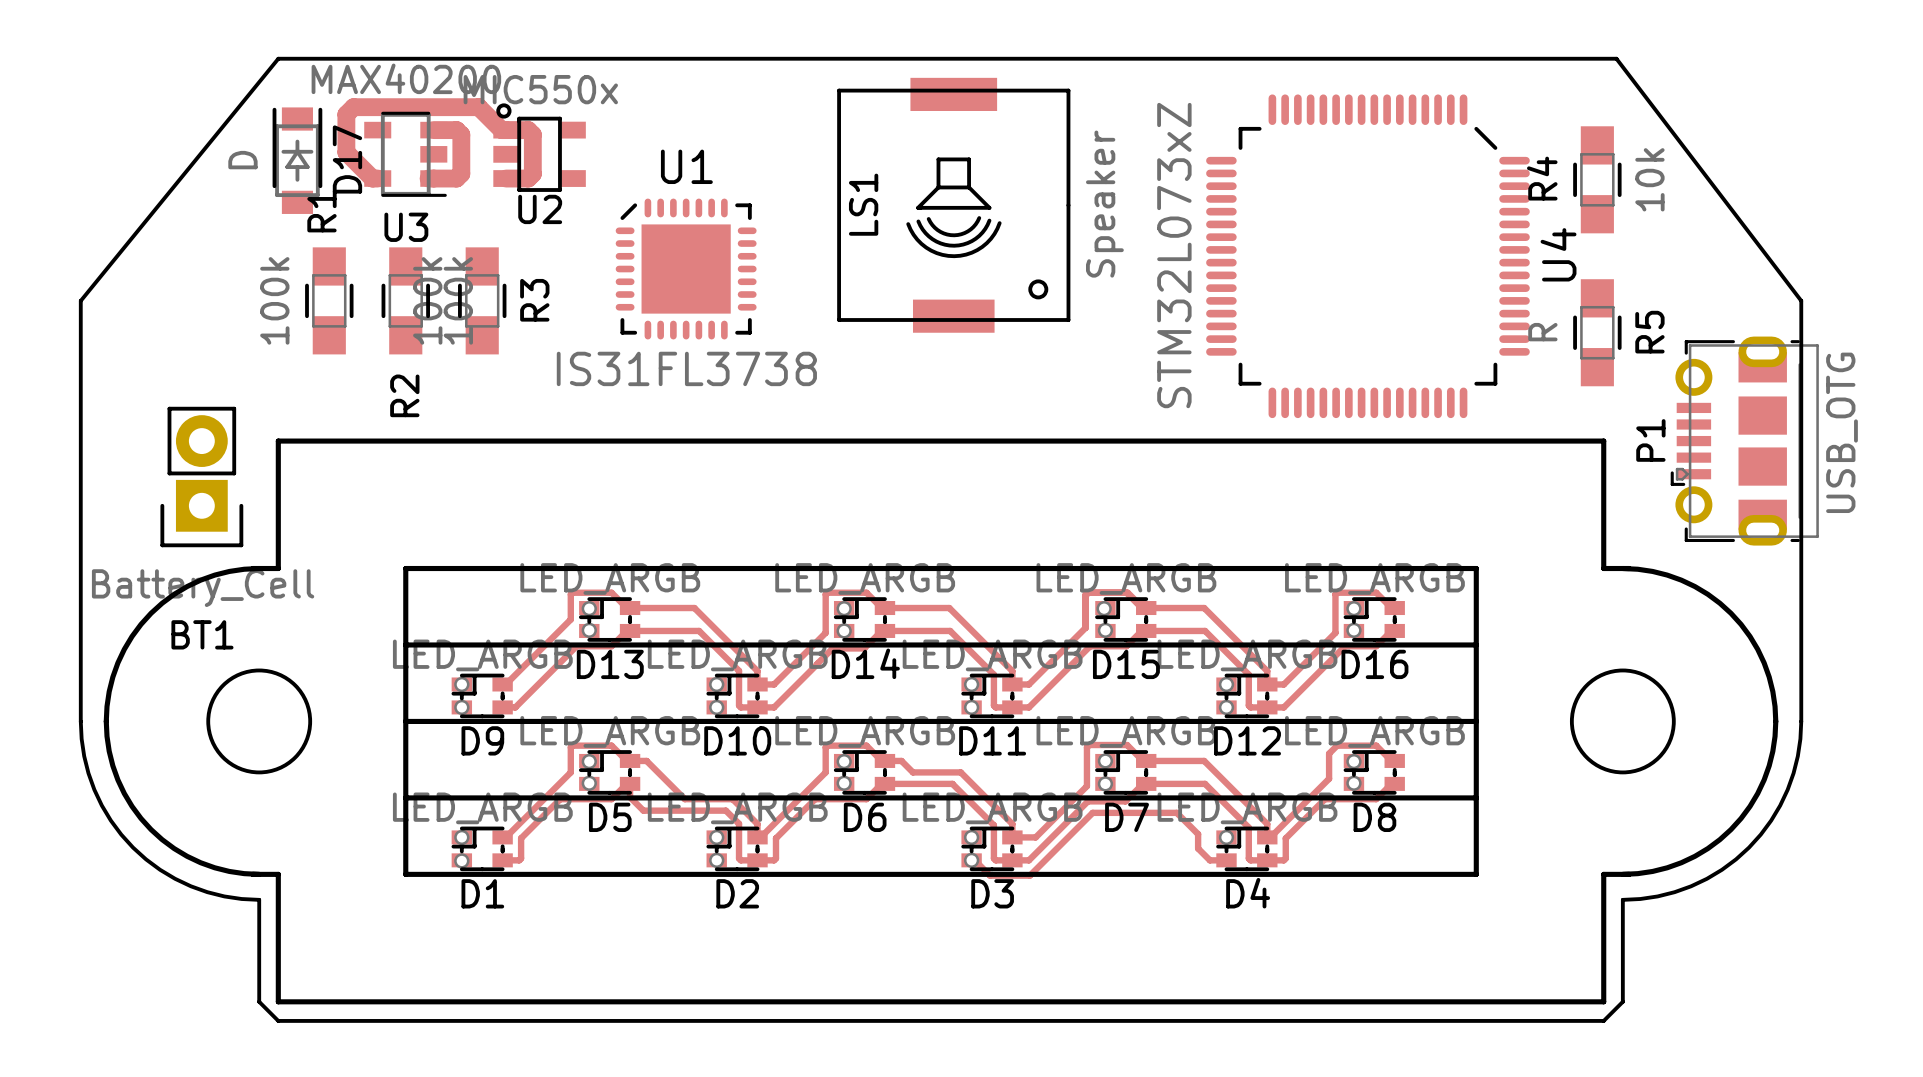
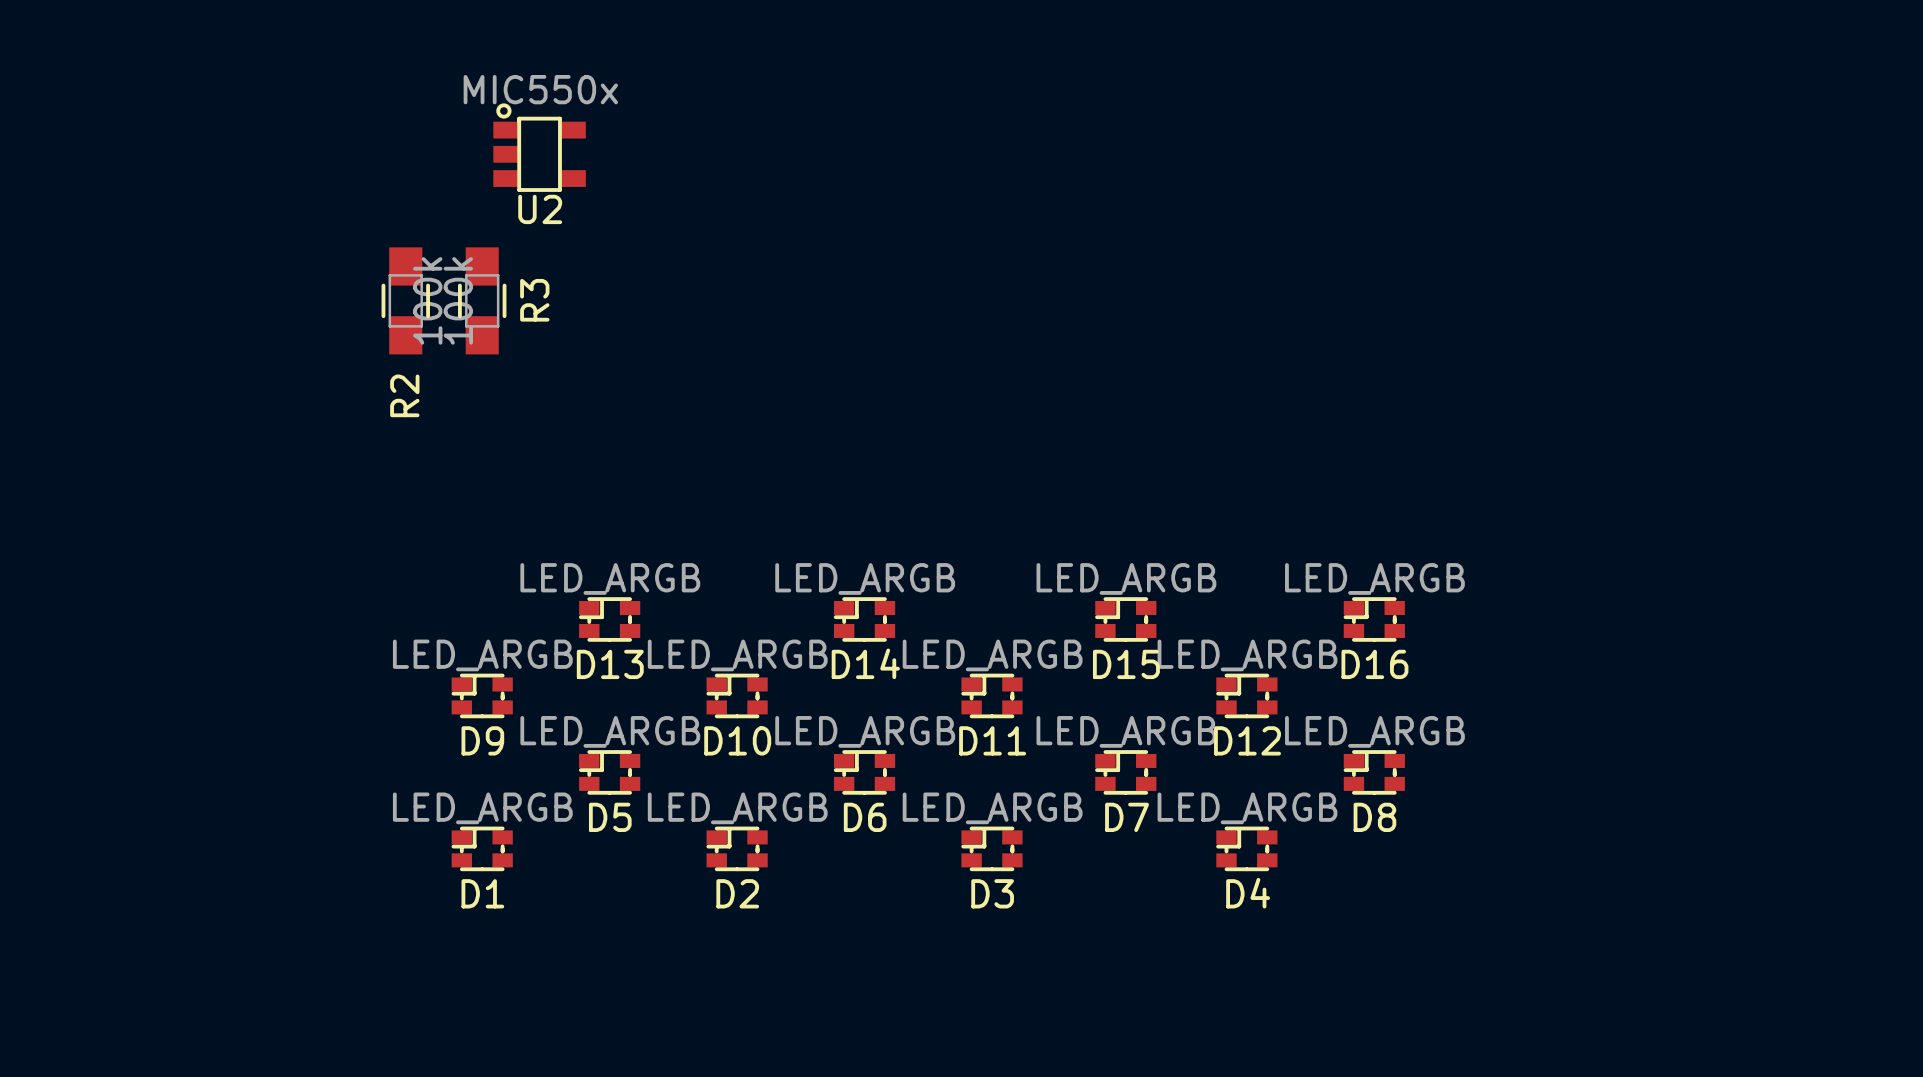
board edge: (278, 58) (1616, 58) (1801, 300) (1801, 721) (1797, 756) (1787, 789) (1780, 805) (1760, 834) (1736, 859) (1721, 869) (1706, 878) (1674, 892) (1657, 896) (1622, 899) (1622, 1001) (1603, 1020) (278, 1020) (259, 1001) (259, 899) (224, 896) (190, 886) (160, 869) (133, 847) (110, 820) (94, 789) (84, 756) (80, 721) (80, 300) (278, 58) -> none
track: (433, 130) (456, 130) (461, 134) (461, 173) (456, 178) (428, 178) -> none
U3: MAX40200 (405, 154) -> none
D17: D (297, 160) -> none
track: (377, 178) (372, 178) (346, 152) (346, 114) (353, 107) (478, 107) (501, 130) (528, 130) (532, 134) (532, 173) (528, 178) (506, 178) (525, 178) -> none
R4: 10k (1597, 179) -> none
LS1: Speaker (953, 205) -> none
U4: STM32L073xZ (1367, 256) -> none
U1: IS31FL3738 (686, 269) -> none
R1: 100k (329, 300) -> none
R5: R (1597, 332) -> none
P1: USB_OTG (1744, 441) -> none
BT1: Battery_Cell (201, 477) -> none
line: (252, 568) (278, 568) (278, 441) (1603, 441) (1603, 568) (1629, 568) -> none
line: (259, 568) (229, 571) (200, 580) (174, 594) (151, 613) (132, 636) (117, 662) (109, 691) (106, 721) (109, 751) (117, 779) (132, 806) (151, 829) (174, 848) (200, 862) (229, 871) (259, 874) -> none
line: (405, 568) (1476, 568) (1476, 874) (405, 874) (405, 568) -> none
line: (1622, 568) (1652, 571) (1681, 580) (1707, 594) (1730, 613) (1750, 636) (1764, 662) (1772, 691) (1775, 721) (1772, 751) (1764, 779) (1750, 806) (1730, 829) (1707, 848) (1681, 862) (1652, 871) (1622, 874) -> none
track: (1126, 592) (1141, 608) (1204, 608) (1267, 671) (1267, 684) (1283, 684) (1335, 632) (1335, 594) (1337, 592) (1376, 592) (1391, 608) (1394, 608) -> none
via: (589, 608) -> none
via: (844, 608) -> none
via: (1104, 608) -> none
track: (1143, 608) (1127, 592) (1087, 592) (1085, 594) (1085, 627) (1028, 684) (1012, 684) (1012, 671) (949, 608) (881, 608) (866, 592) (827, 592) (825, 594) (825, 632) (774, 684) (757, 684) (757, 671) (694, 608) (626, 608) (611, 592) (572, 592) (570, 594) (570, 619) (505, 684) (502, 684) -> none
via: (1353, 608) -> none
via: (589, 630) -> none
via: (844, 630) -> none
via: (1105, 630) -> none
via: (1353, 630) -> none
track: (1394, 630) (1391, 630) (1376, 646) (1345, 646) (1283, 707) (1250, 707) (1248, 705) (1248, 674) (1205, 630) (1141, 630) (1126, 646) (1090, 646) (1028, 707) (995, 707) (993, 705) (993, 674) (950, 630) (881, 630) (864, 648) (832, 648) (817, 663) -> none
line: (405, 644) (1476, 644) -> none
track: (817, 664) (774, 707) (740, 707) (739, 705) (739, 670) (699, 630) (626, 630) (611, 646) (576, 646) (515, 707) (502, 707) -> none
round board edge: [206, 668, 313, 775] -> none
round board edge: [1569, 668, 1676, 775] -> none
via: (461, 684) -> none
via: (716, 684) -> none
via: (971, 684) -> none
via: (1226, 684) -> none
via: (461, 707) -> none
via: (716, 707) -> none
via: (971, 707) -> none
via: (1226, 707) -> none
line: (405, 721) (1476, 721) -> none
via: (1105, 760) -> none
track: (1139, 760) (1204, 760) (1267, 824) (1267, 837) (1270, 837) (1329, 778) (1329, 753) (1337, 745) (1376, 745) (1391, 760) (1394, 760) -> none
track: (1143, 760) (1127, 745) (1089, 745) (1086, 747) (1086, 786) (1035, 837) (1012, 837) (1012, 824) (960, 772) (912, 772) (901, 760) (881, 760) (866, 745) (827, 745) (825, 747) (825, 772) (760, 837) (757, 837) (757, 824) (732, 799) (684, 799) (646, 760) (626, 760) (611, 745) (572, 745) (570, 747) (570, 772) (505, 837) (502, 837) -> none
via: (589, 761) -> none
via: (844, 761) -> none
via: (1353, 761) -> none
via: (589, 783) -> none
via: (844, 783) -> none
via: (1105, 783) -> none
track: (1139, 783) (1205, 783) (1248, 827) (1248, 858) (1250, 860) (1283, 860) (1285, 858) (1285, 838) (1324, 799) (1376, 799) (1391, 783) (1394, 783) -> none
track: (1143, 783) (1125, 801) (1087, 801) (1028, 860) (995, 860) (993, 858) (993, 825) (952, 783) (881, 783) (866, 799) (815, 799) (775, 838) (775, 858) (774, 860) (740, 860) (739, 858) (739, 823) (725, 810) (643, 810) (630, 797) (630, 783) (626, 783) (611, 799) (560, 799) (521, 838) (521, 858) (519, 860) (502, 860) -> none
via: (1353, 783) -> none
line: (405, 797) (1476, 797) -> none
via: (461, 837) -> none
via: (716, 837) -> none
via: (971, 837) -> none
via: (1226, 837) -> none
via: (461, 860) -> none
via: (716, 860) -> none
track: (971, 860) (974, 860) (990, 875) (1029, 875) (1092, 812) (1176, 812) (1198, 834) (1198, 848) (1209, 860) (1226, 860) -> none
via: (971, 860) -> none
line: (252, 874) (278, 874) (278, 1001) (1603, 1001) (1603, 874) (1629, 874) -> none

